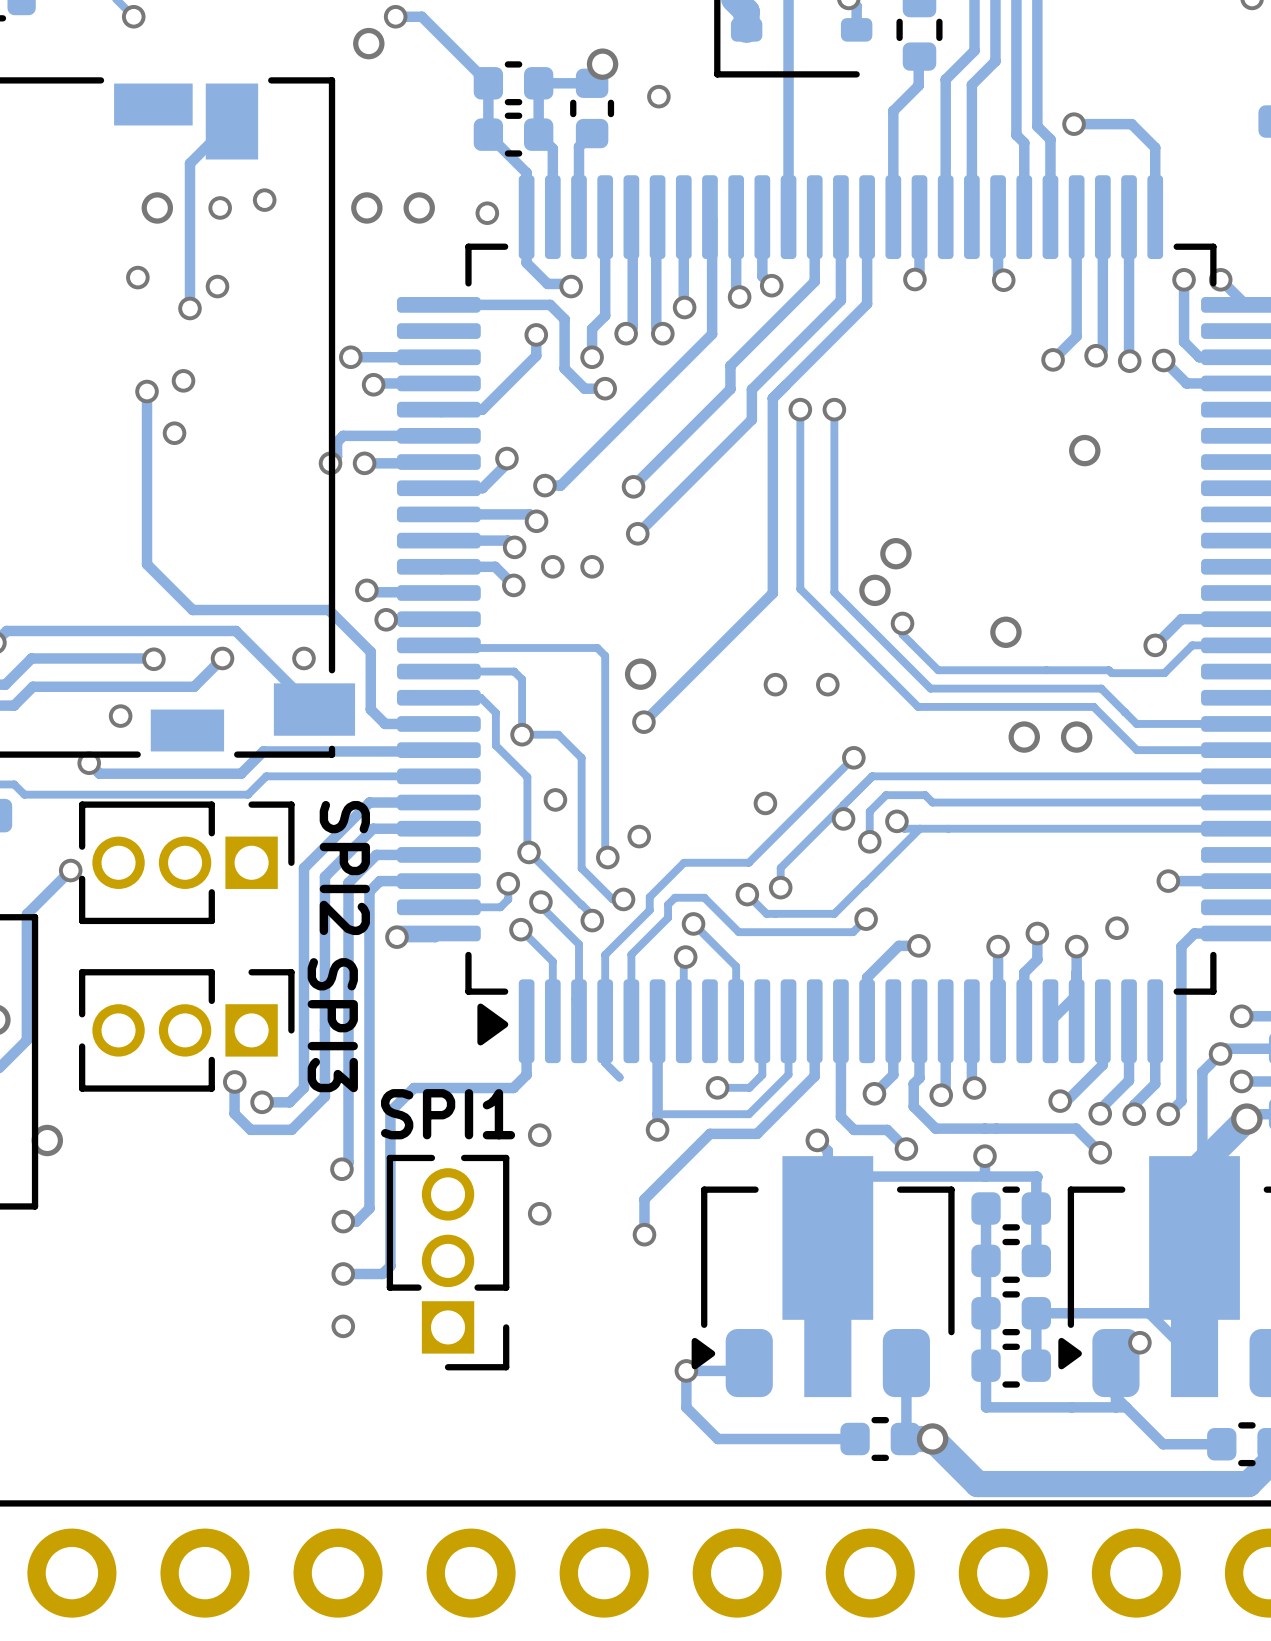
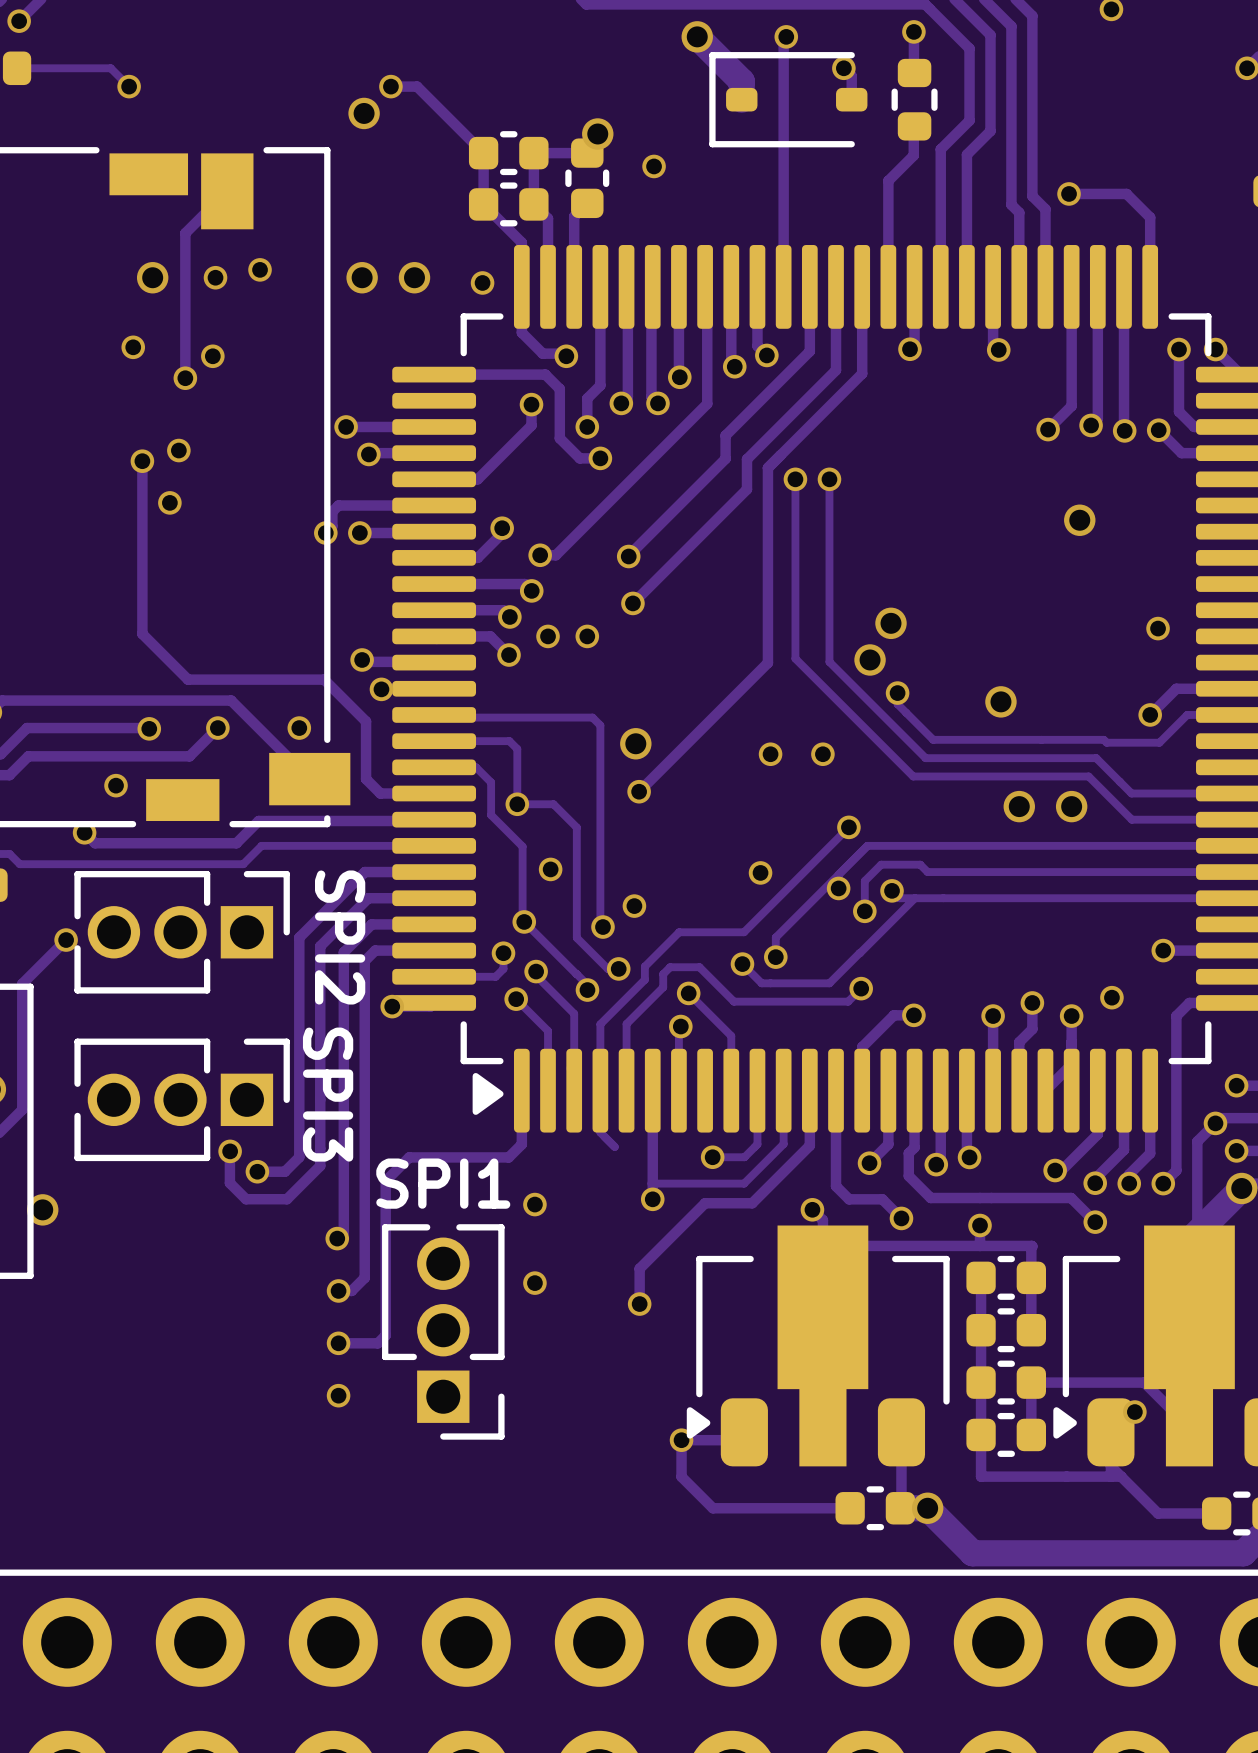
via: none -> (1158, 628)

